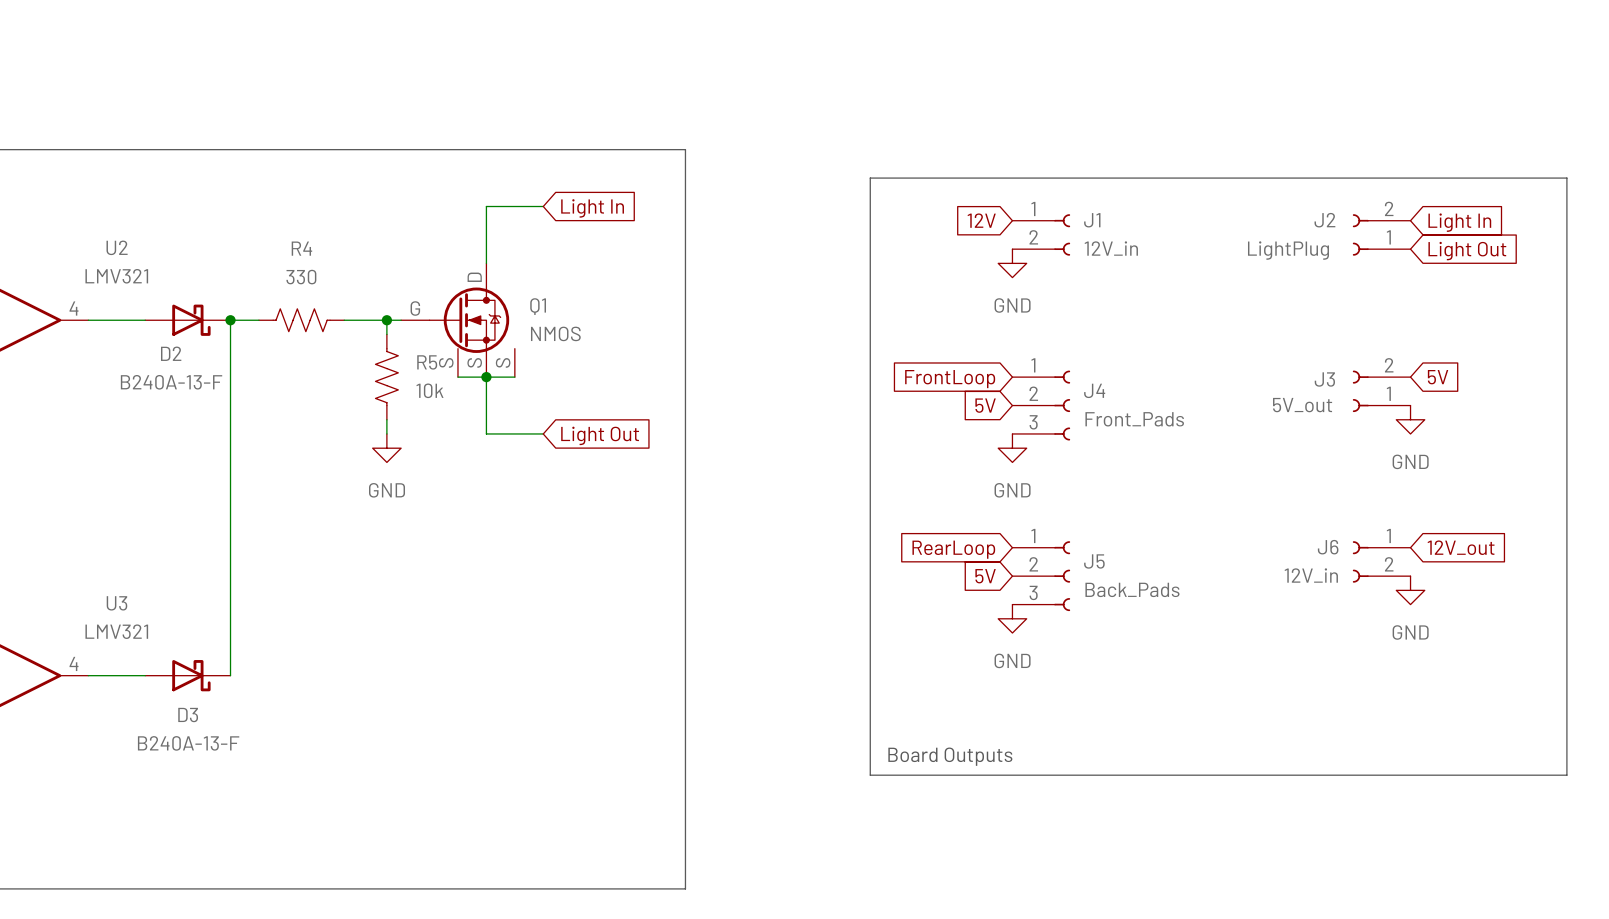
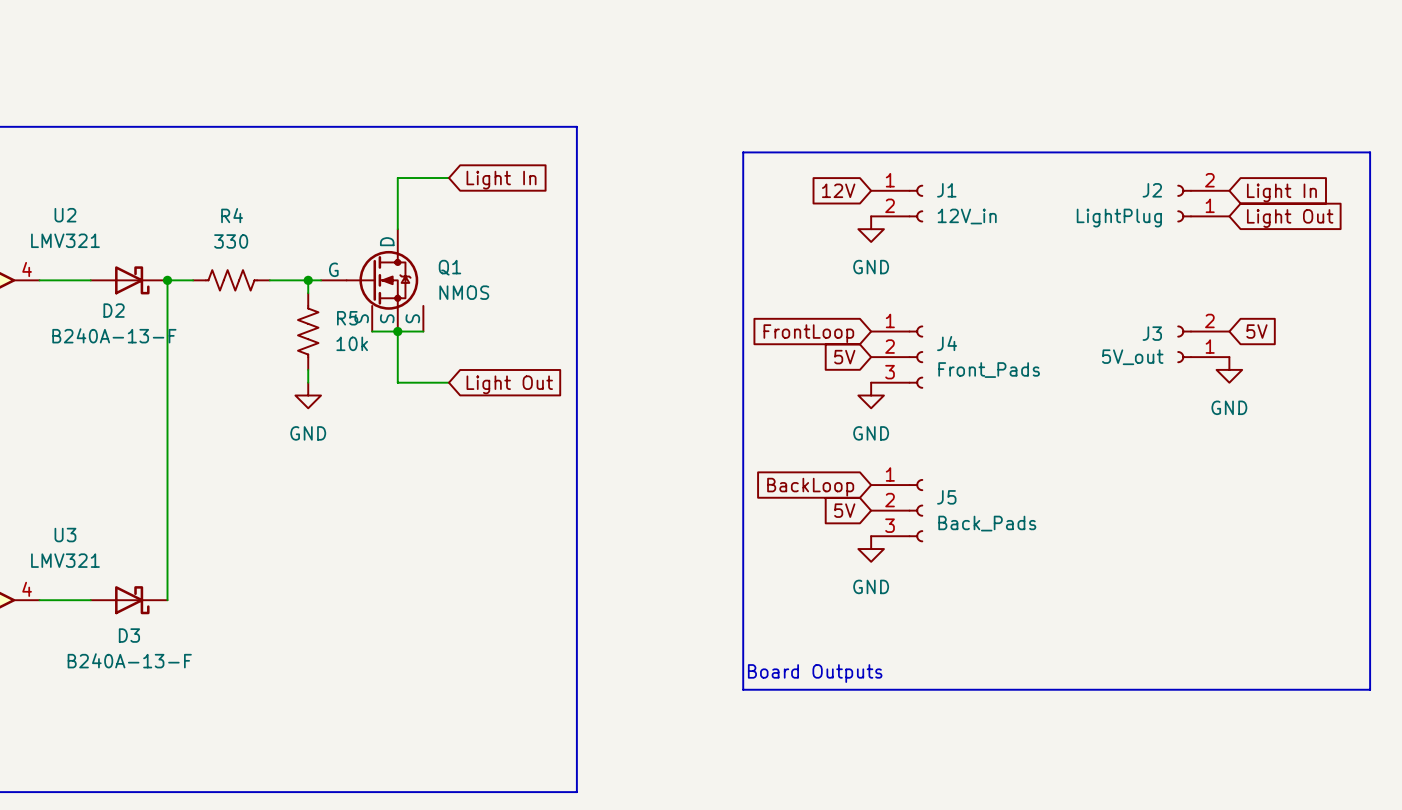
global label: 12V_out (1461, 547) -> none
global label: RearLoop (953, 549) -> BackLoop (810, 487)
J6: 12V_in (1381, 561) -> none
power symbol: GND (1410, 590) -> none

